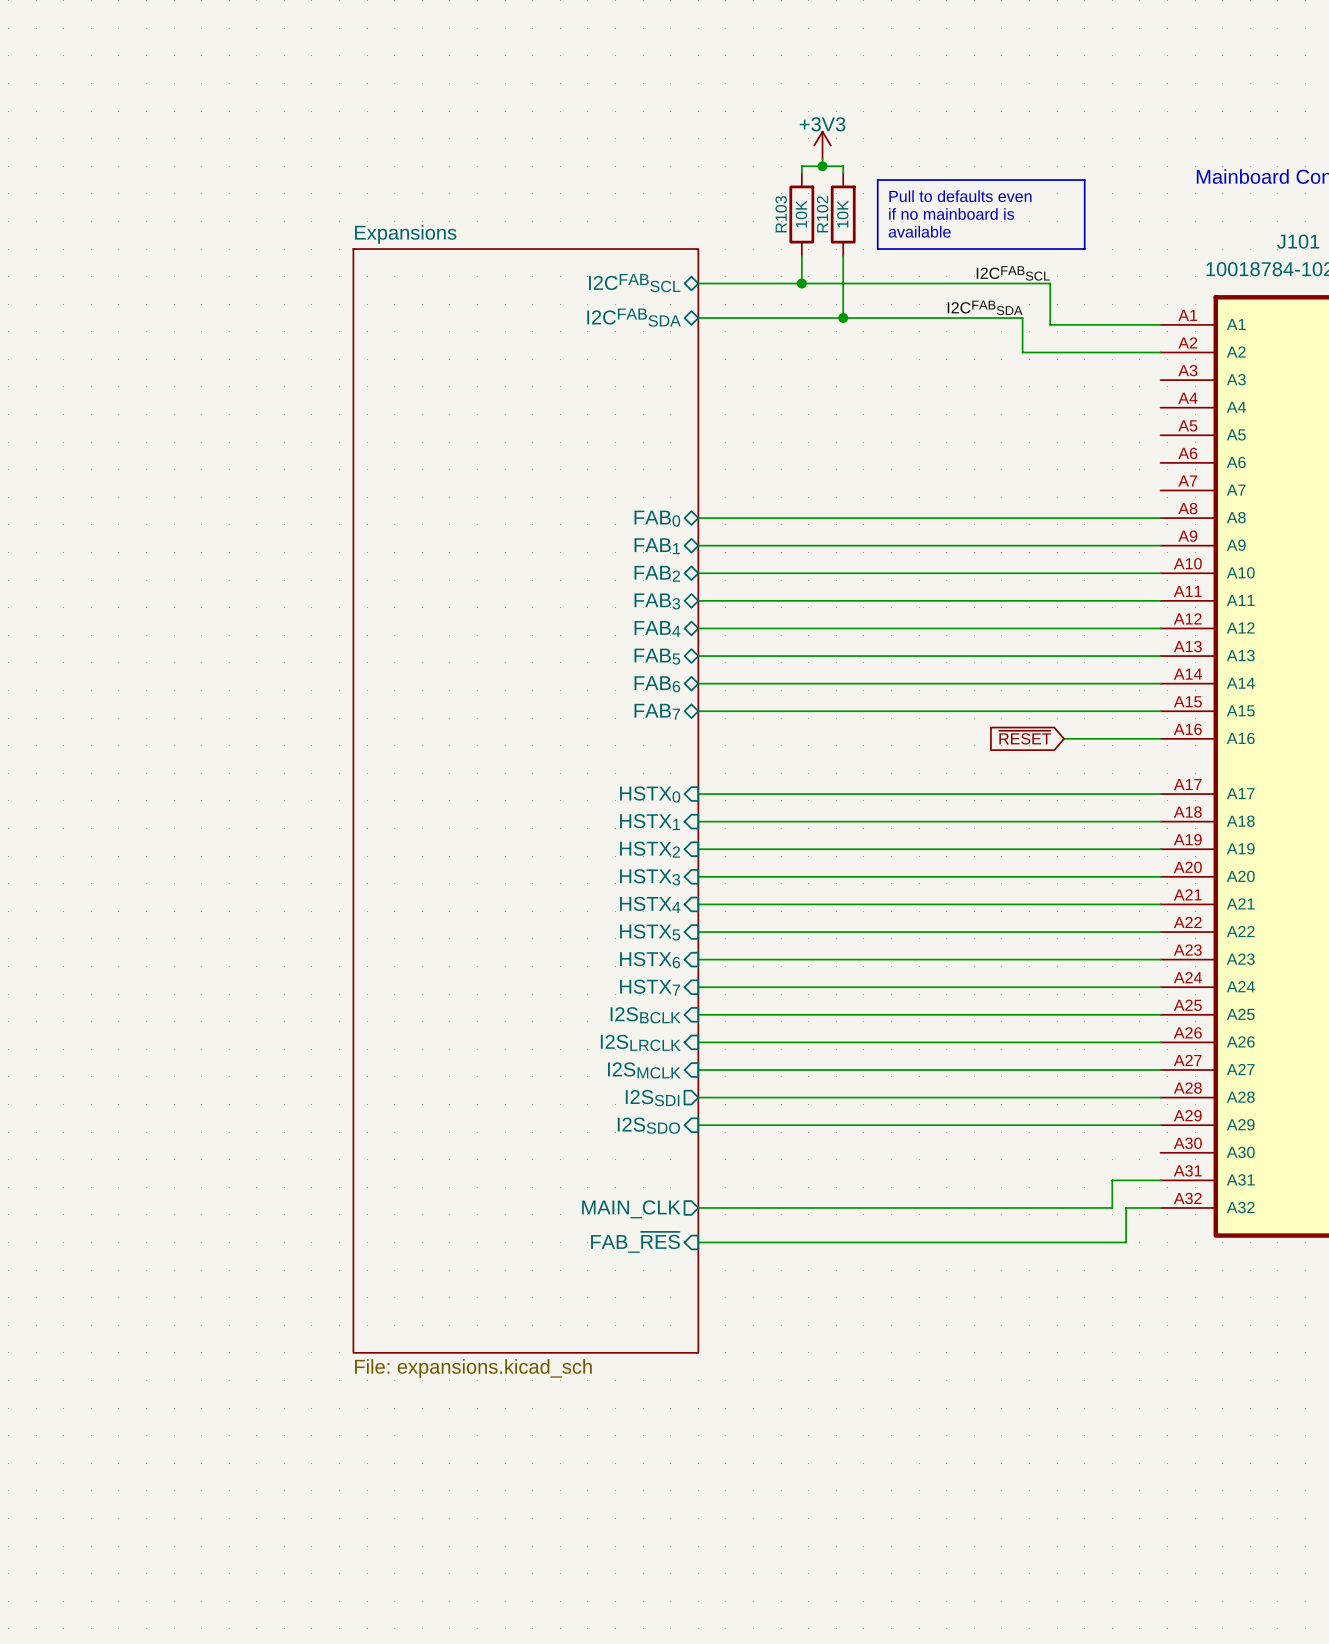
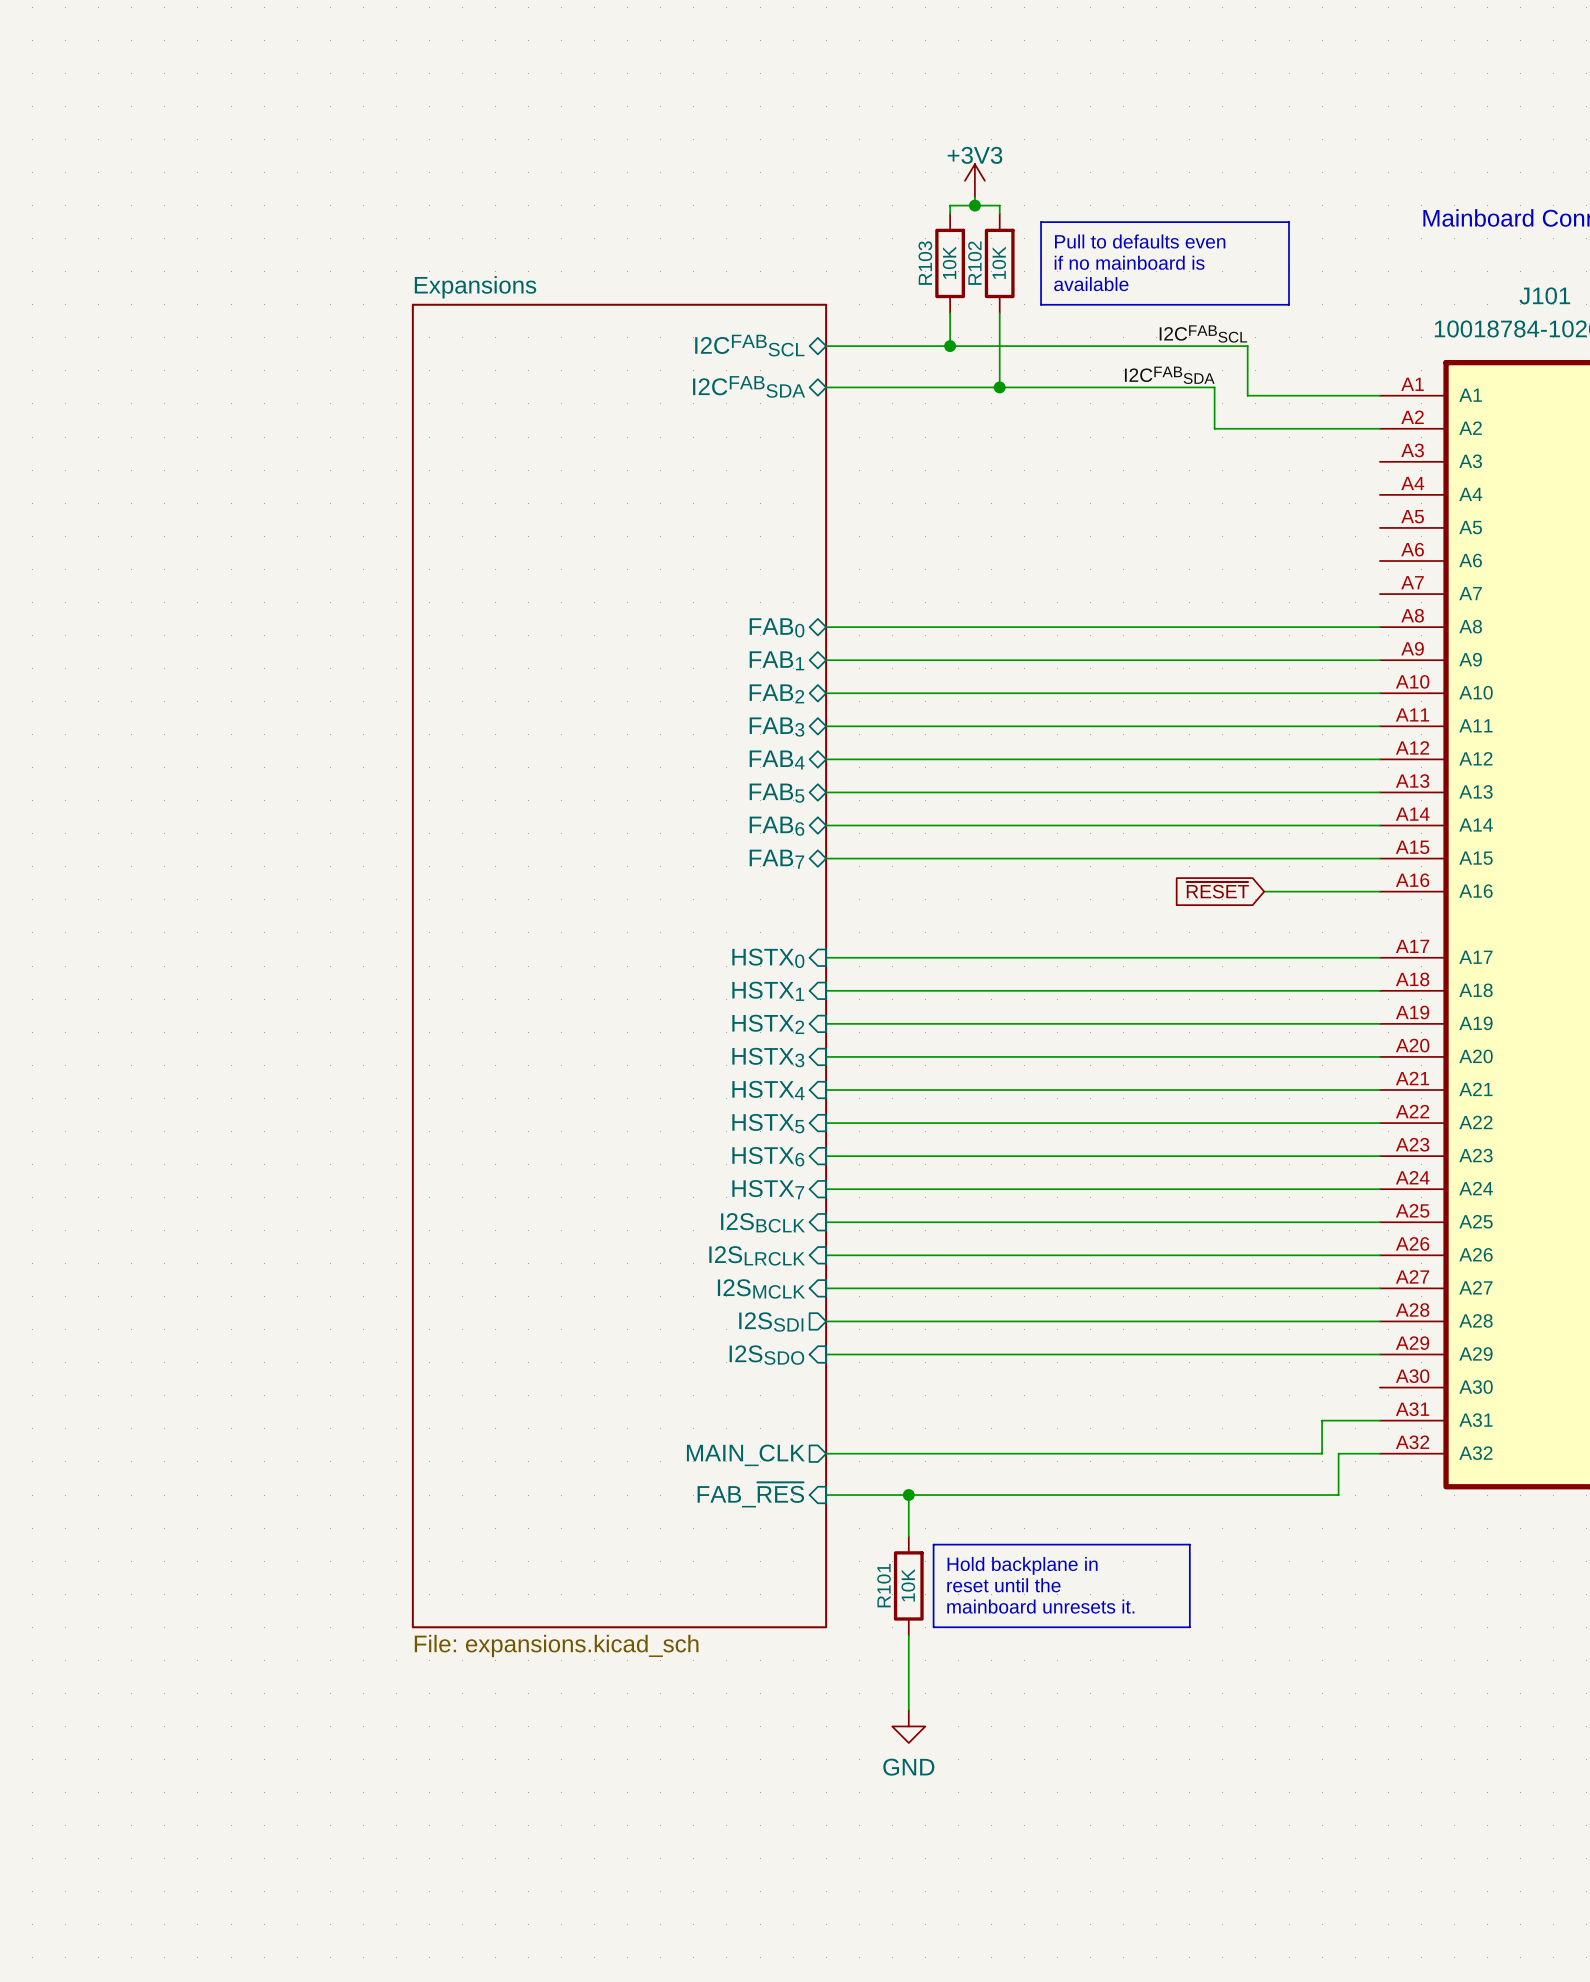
wire: none -> (908, 1495) (908, 1536)
junction: none -> (908, 1495)
line: none -> (933, 1544) (1189, 1544) (1189, 1627) (933, 1627) (933, 1544)
text: none -> Hold backplane in (1022, 1565)
text: none -> reset until the (1003, 1585)
R101: none -> 10K (908, 1585)
text: none -> mainboard unresets it. (1040, 1606)
wire: none -> (908, 1635) (908, 1709)
power symbol: none -> GND (908, 1726)

